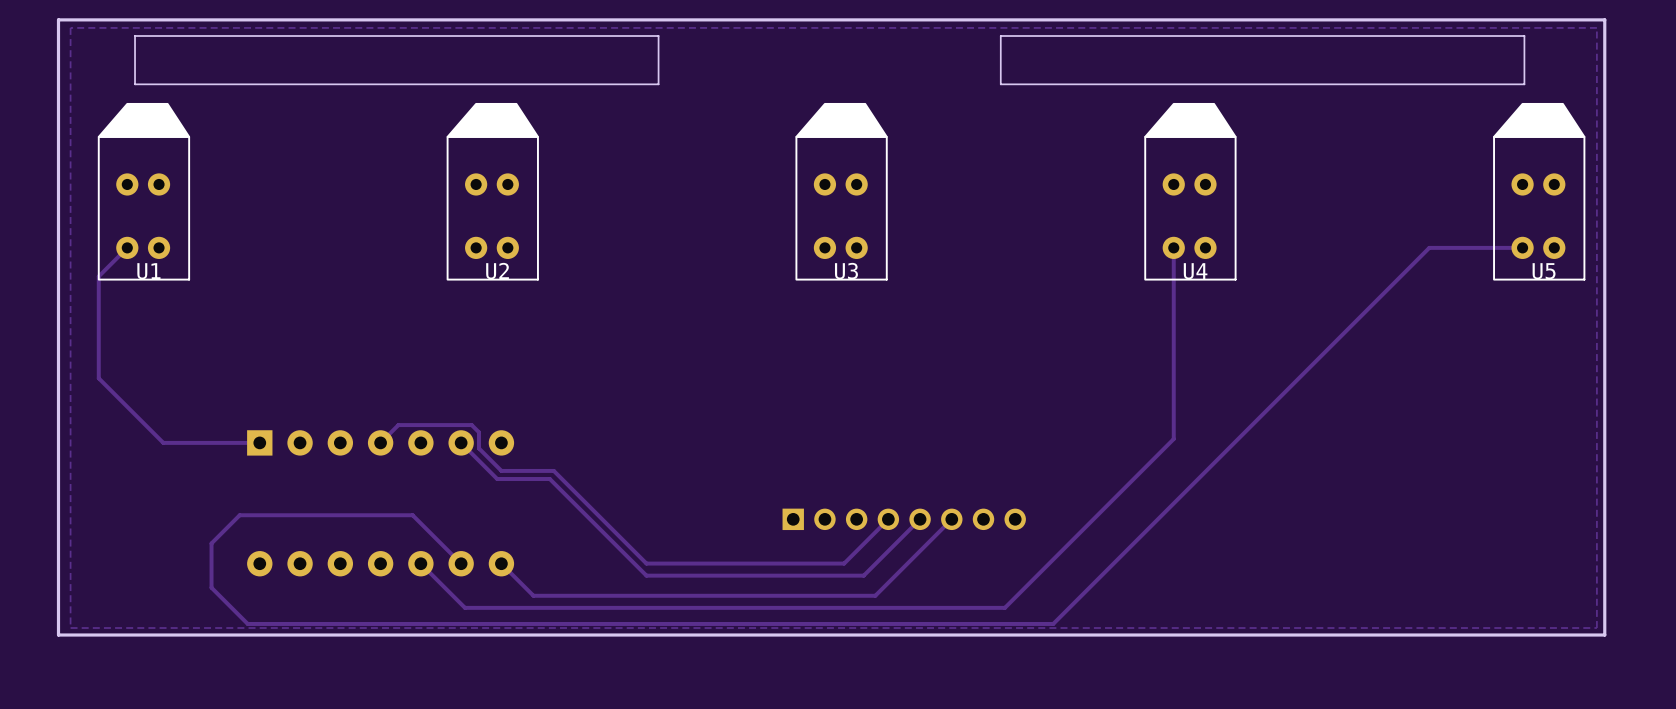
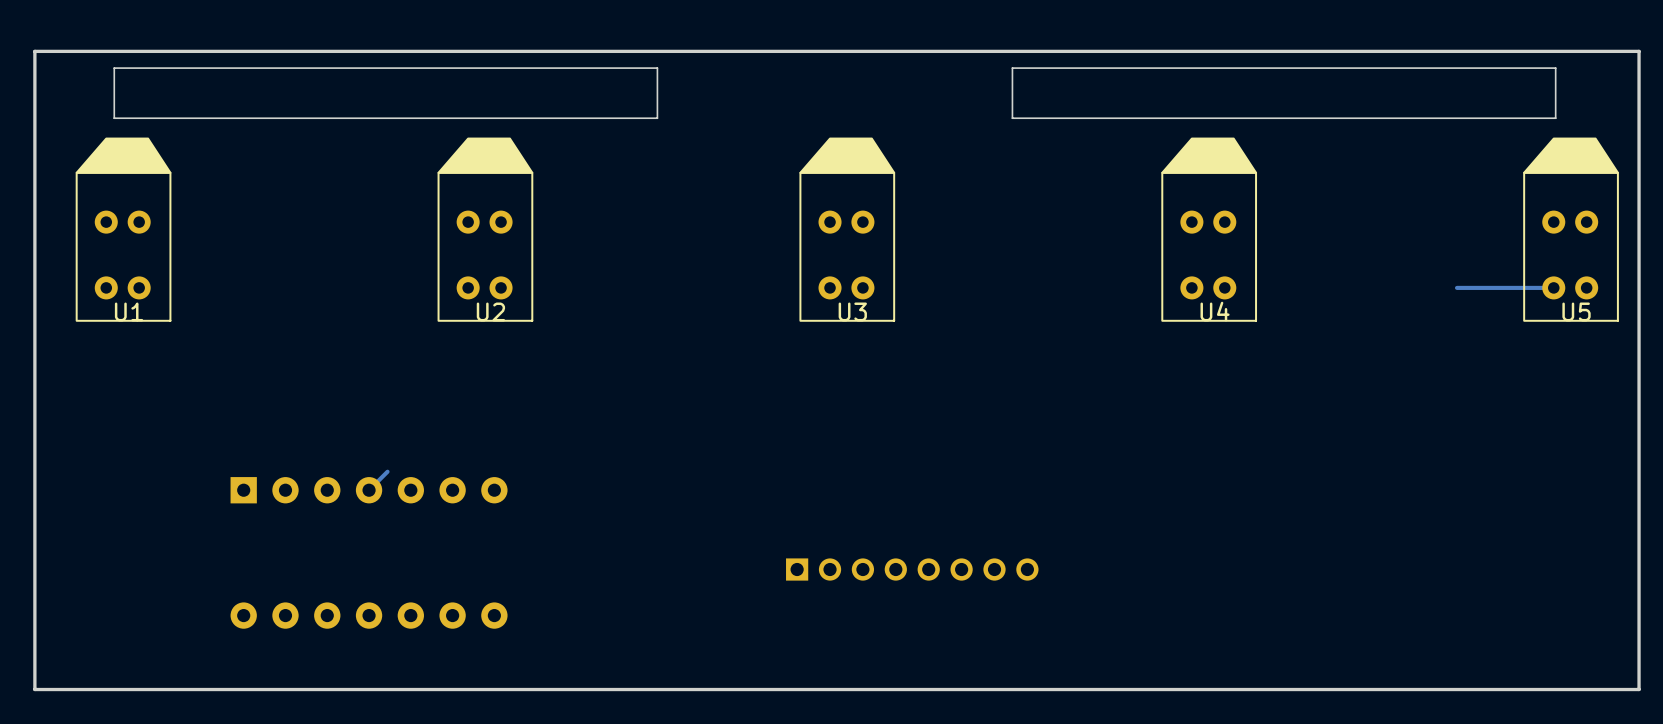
zone outline: (1596, 27) (1596, 628) (70, 628) (70, 27) (1596, 27) -> none
track: (127, 247) (98, 276) (98, 378) (163, 442) (259, 442) -> none
track: (1173, 247) (1173, 439) (1004, 607) (465, 607) (420, 563) -> none
track: (1429, 247) (1053, 623) (247, 623) (211, 587) (211, 543) (239, 515) (412, 515) (461, 563) -> none
track: (398, 425) (471, 425) (478, 432) (478, 448) (501, 470) (553, 470) (646, 563) (844, 563) (888, 519) -> none
track: (461, 442) (497, 478) (549, 478) (646, 575) (863, 575) (920, 519) -> none
track: (951, 519) (875, 595) (533, 595) (501, 563) -> none

